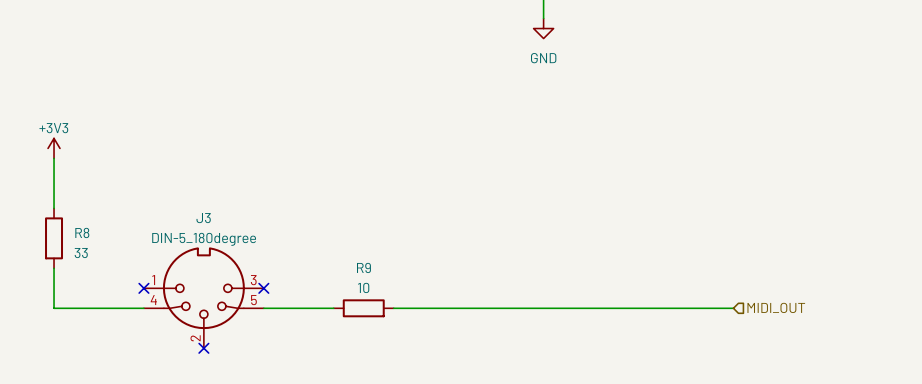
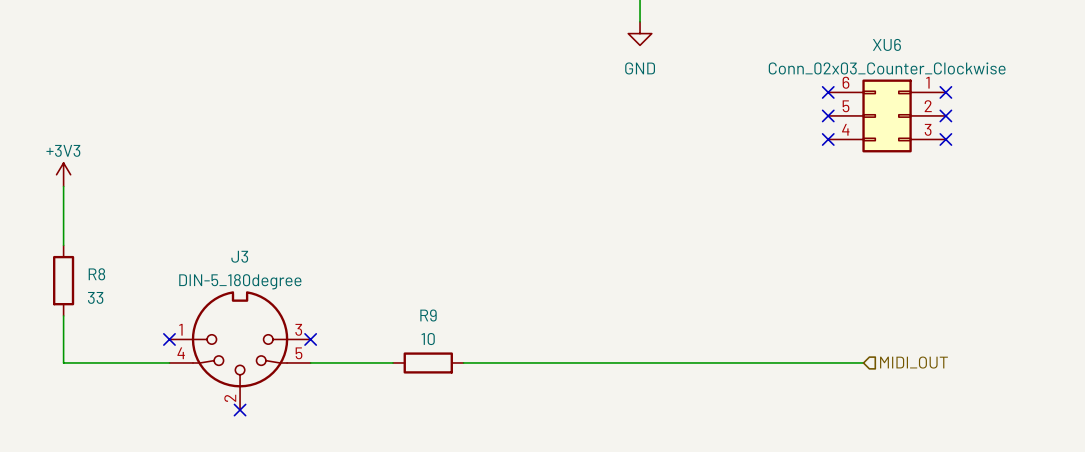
no-connect mark: none -> (828, 92)
no-connect mark: none -> (945, 92)
no-connect mark: none -> (828, 115)
XU6: none -> Conn_02x03_Counter_Clockwise (887, 115)
no-connect mark: none -> (945, 115)
no-connect mark: none -> (828, 139)
no-connect mark: none -> (945, 139)

